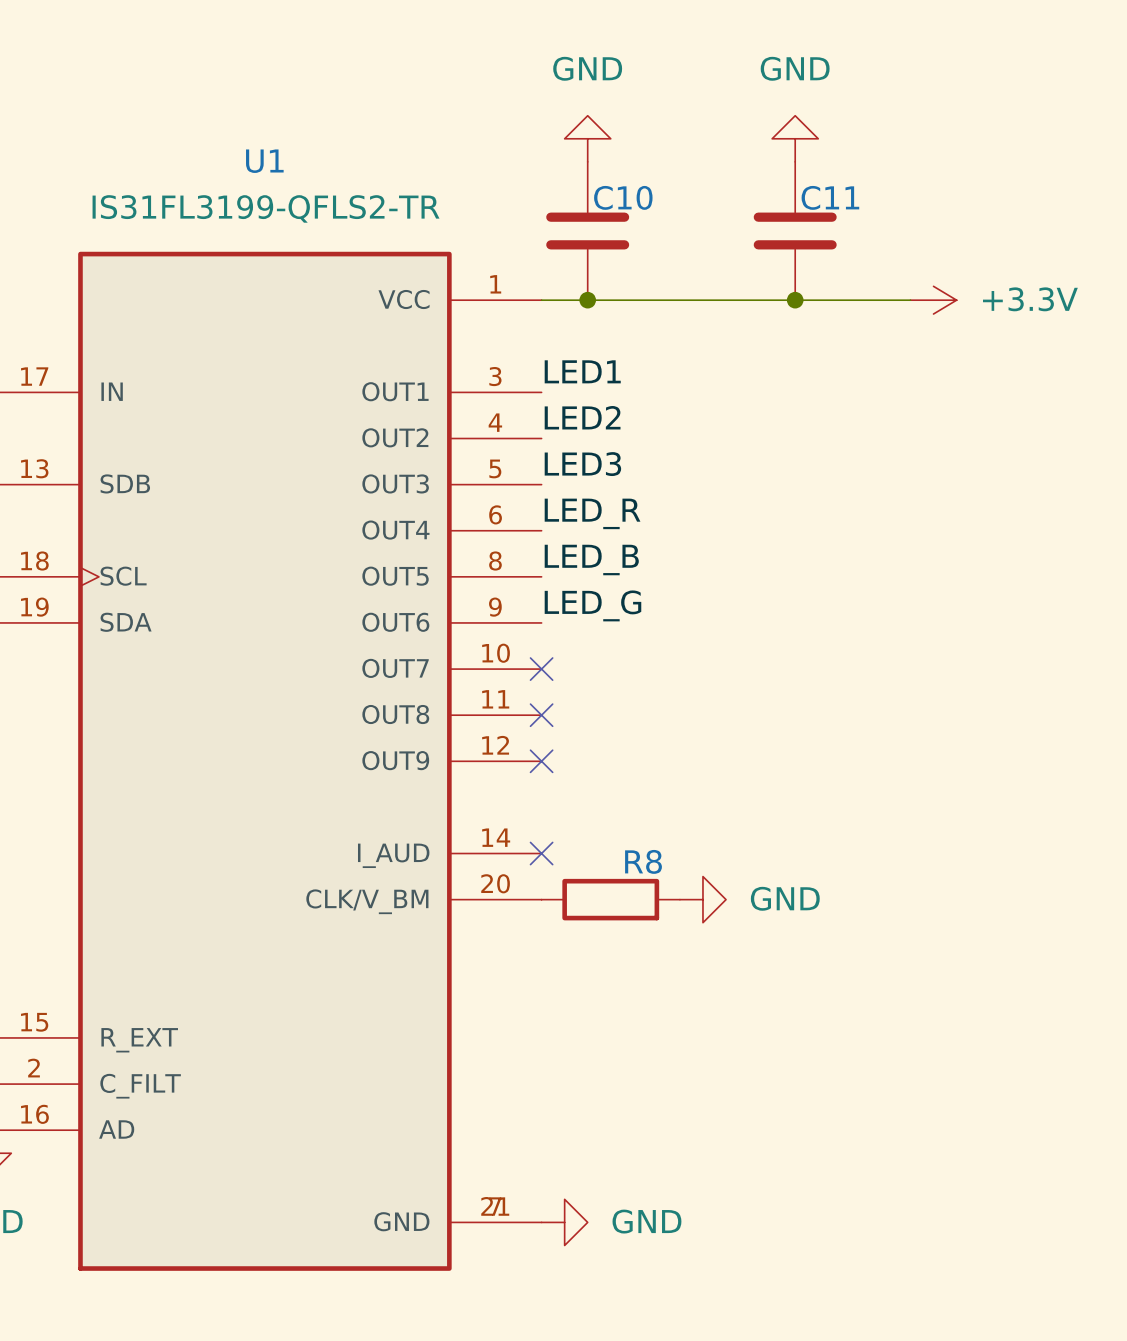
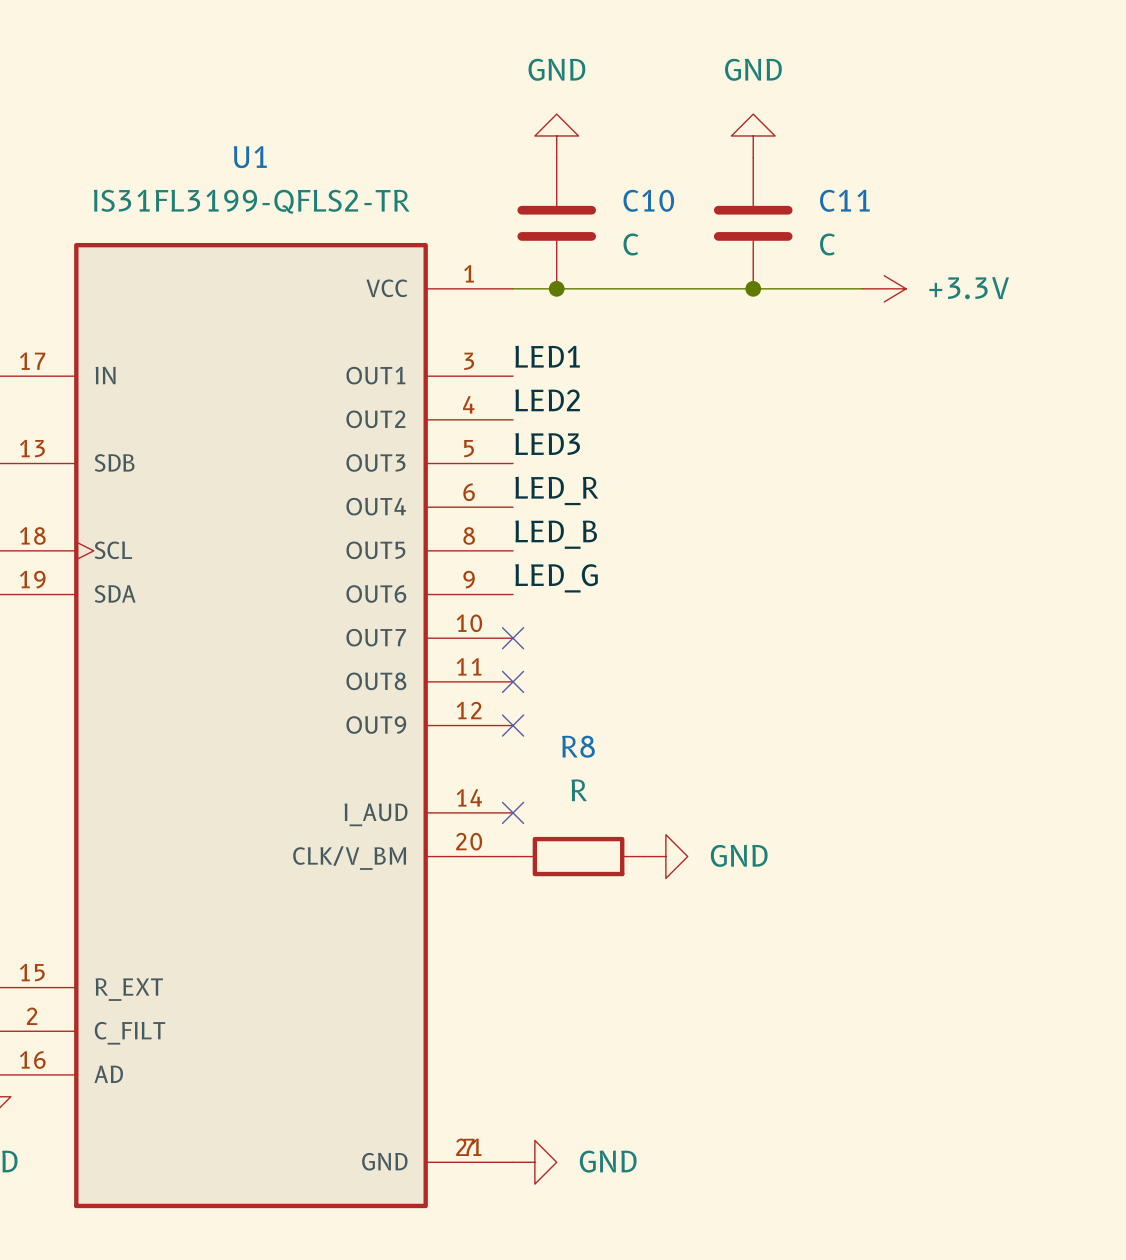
C10 name position: C10 (623, 197) -> C10 (648, 200)
C11 name position: C11 (830, 197) -> C11 (844, 200)
C10 value: none -> C (630, 244)
C11 value: none -> C (827, 244)
R8 value: none -> R (579, 790)
R8 name position: R8 (643, 861) -> R8 (578, 746)

